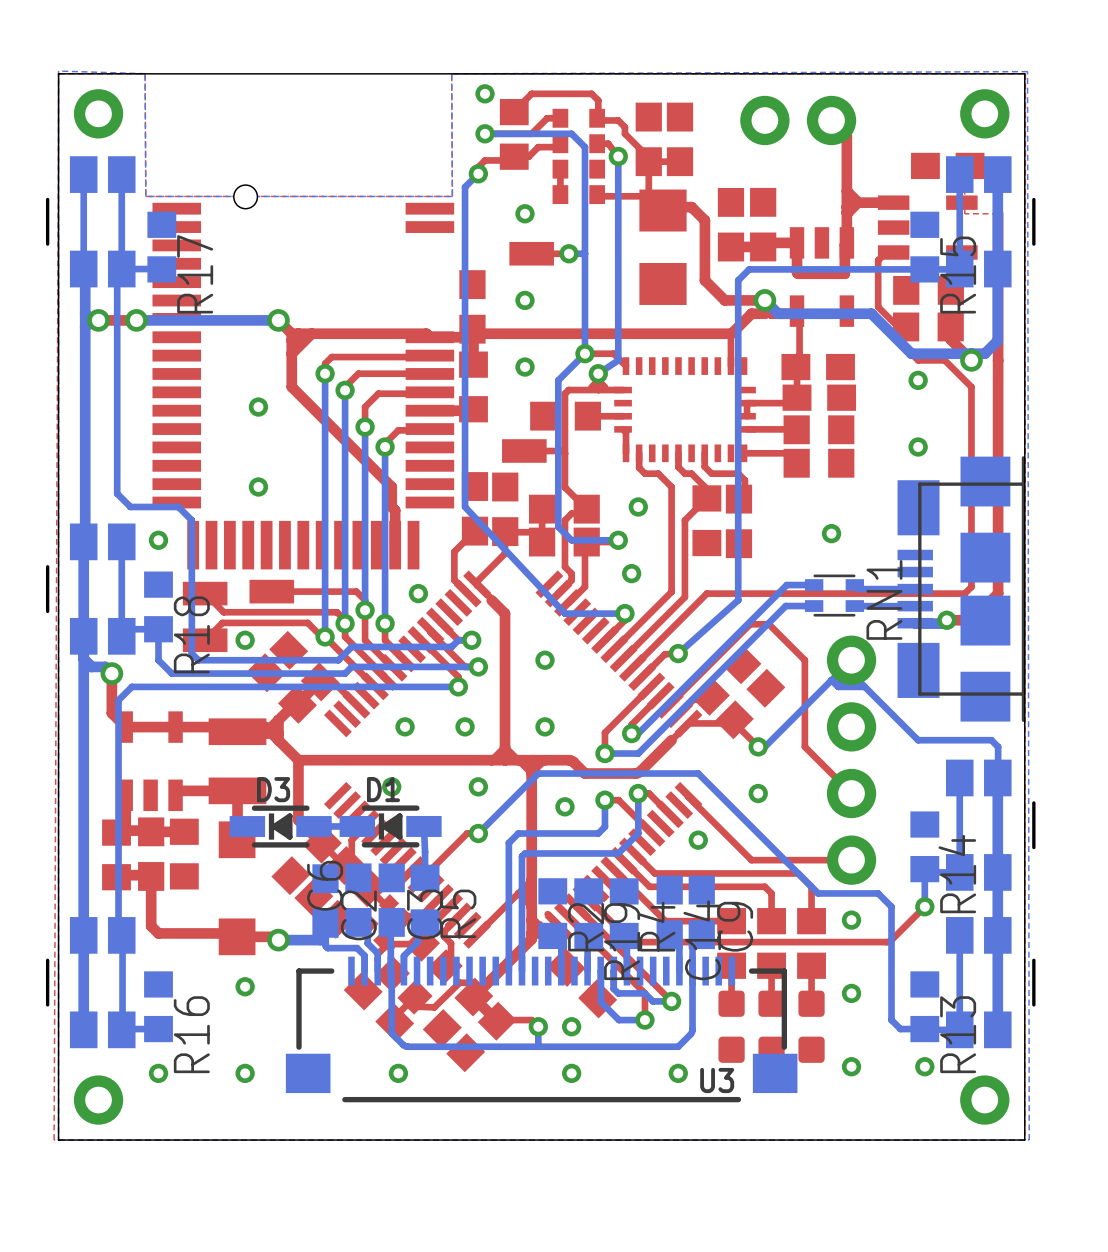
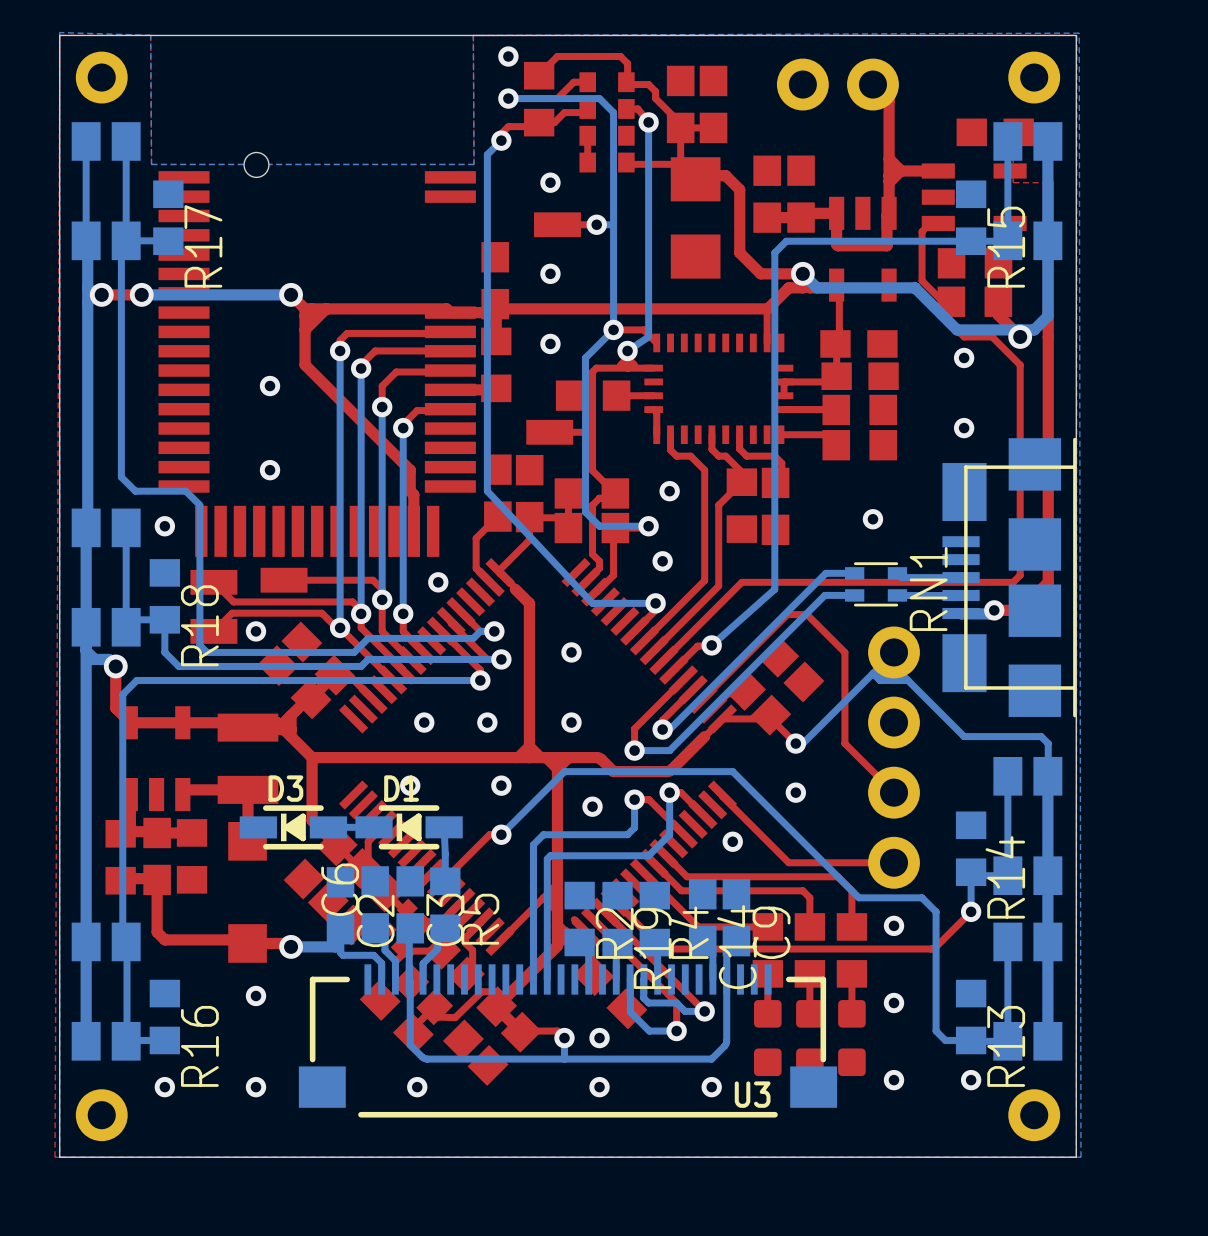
part footprint: [45, 156, 136, 288] -> [71, 122, 141, 261]
part footprint: [945, 156, 1036, 288] -> [993, 122, 1063, 261]
part footprint: [45, 523, 136, 655] -> [71, 508, 141, 647]
part footprint: [945, 759, 1036, 891] -> [993, 757, 1063, 896]
part footprint: [45, 917, 136, 1049] -> [71, 922, 141, 1061]
part footprint: [945, 917, 1036, 1049] -> [993, 922, 1063, 1061]

